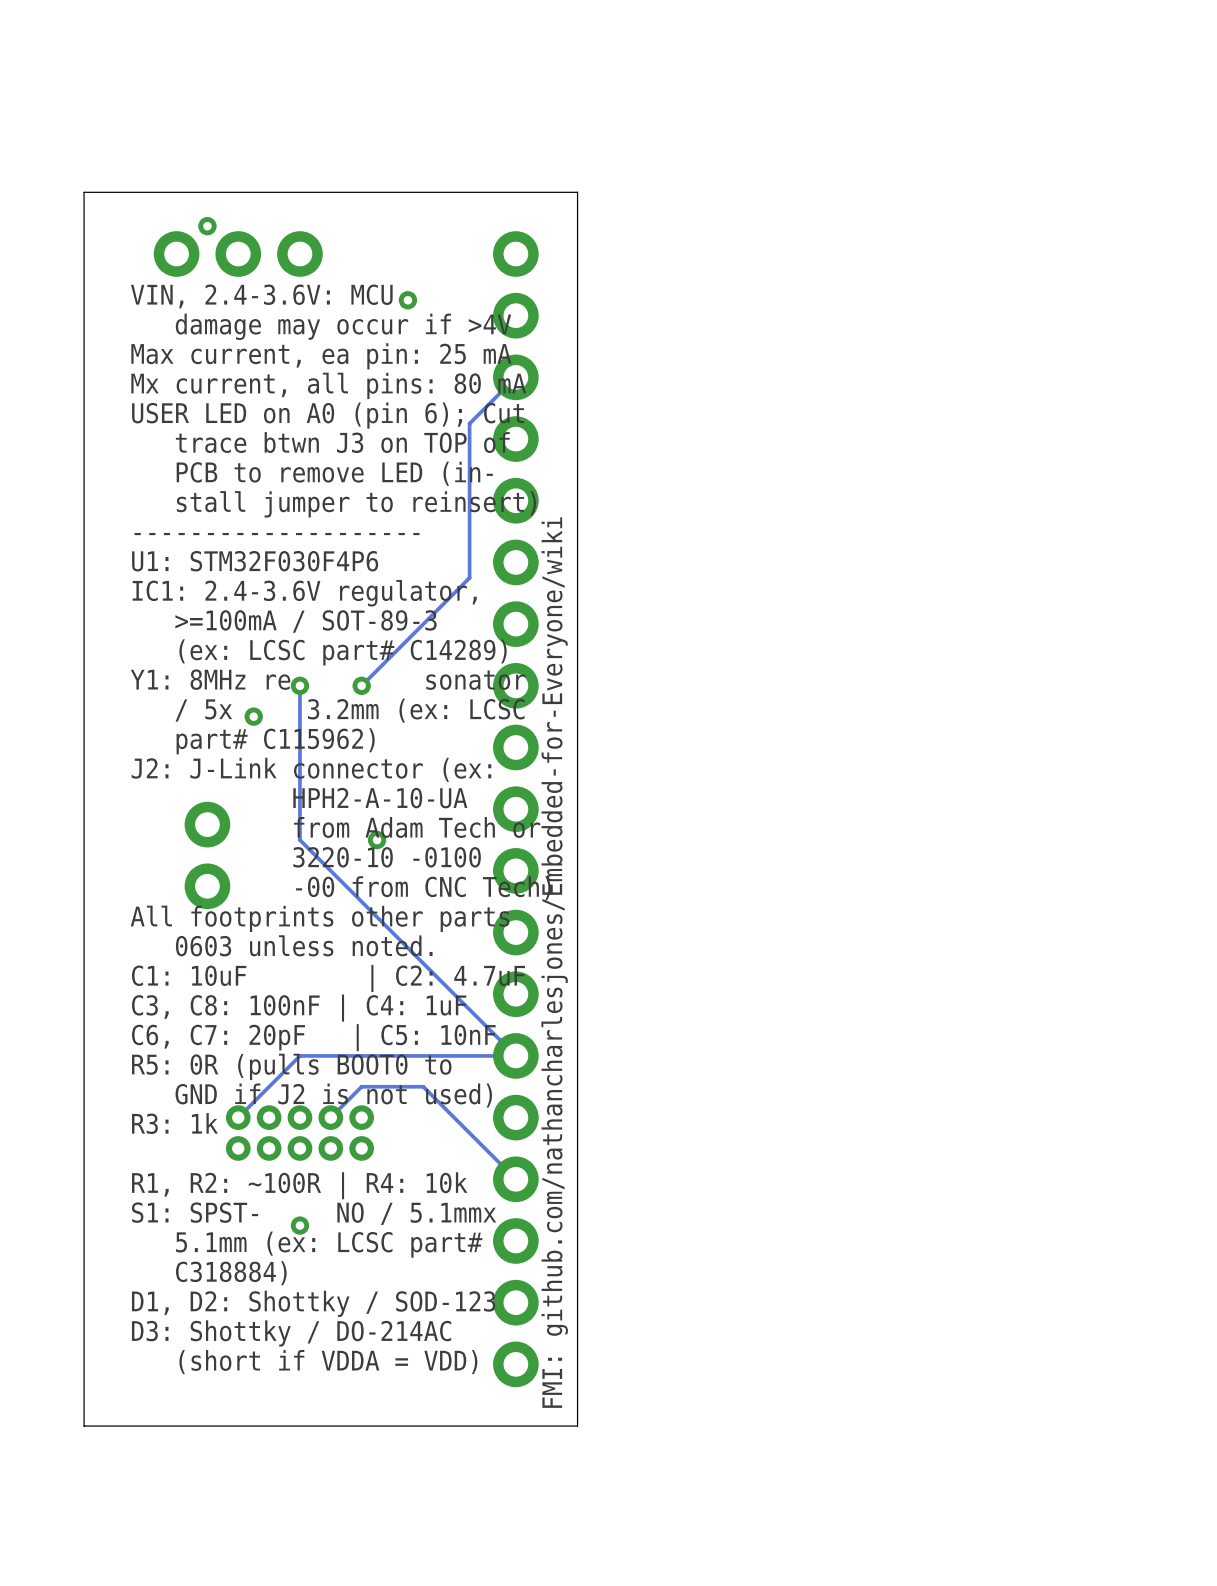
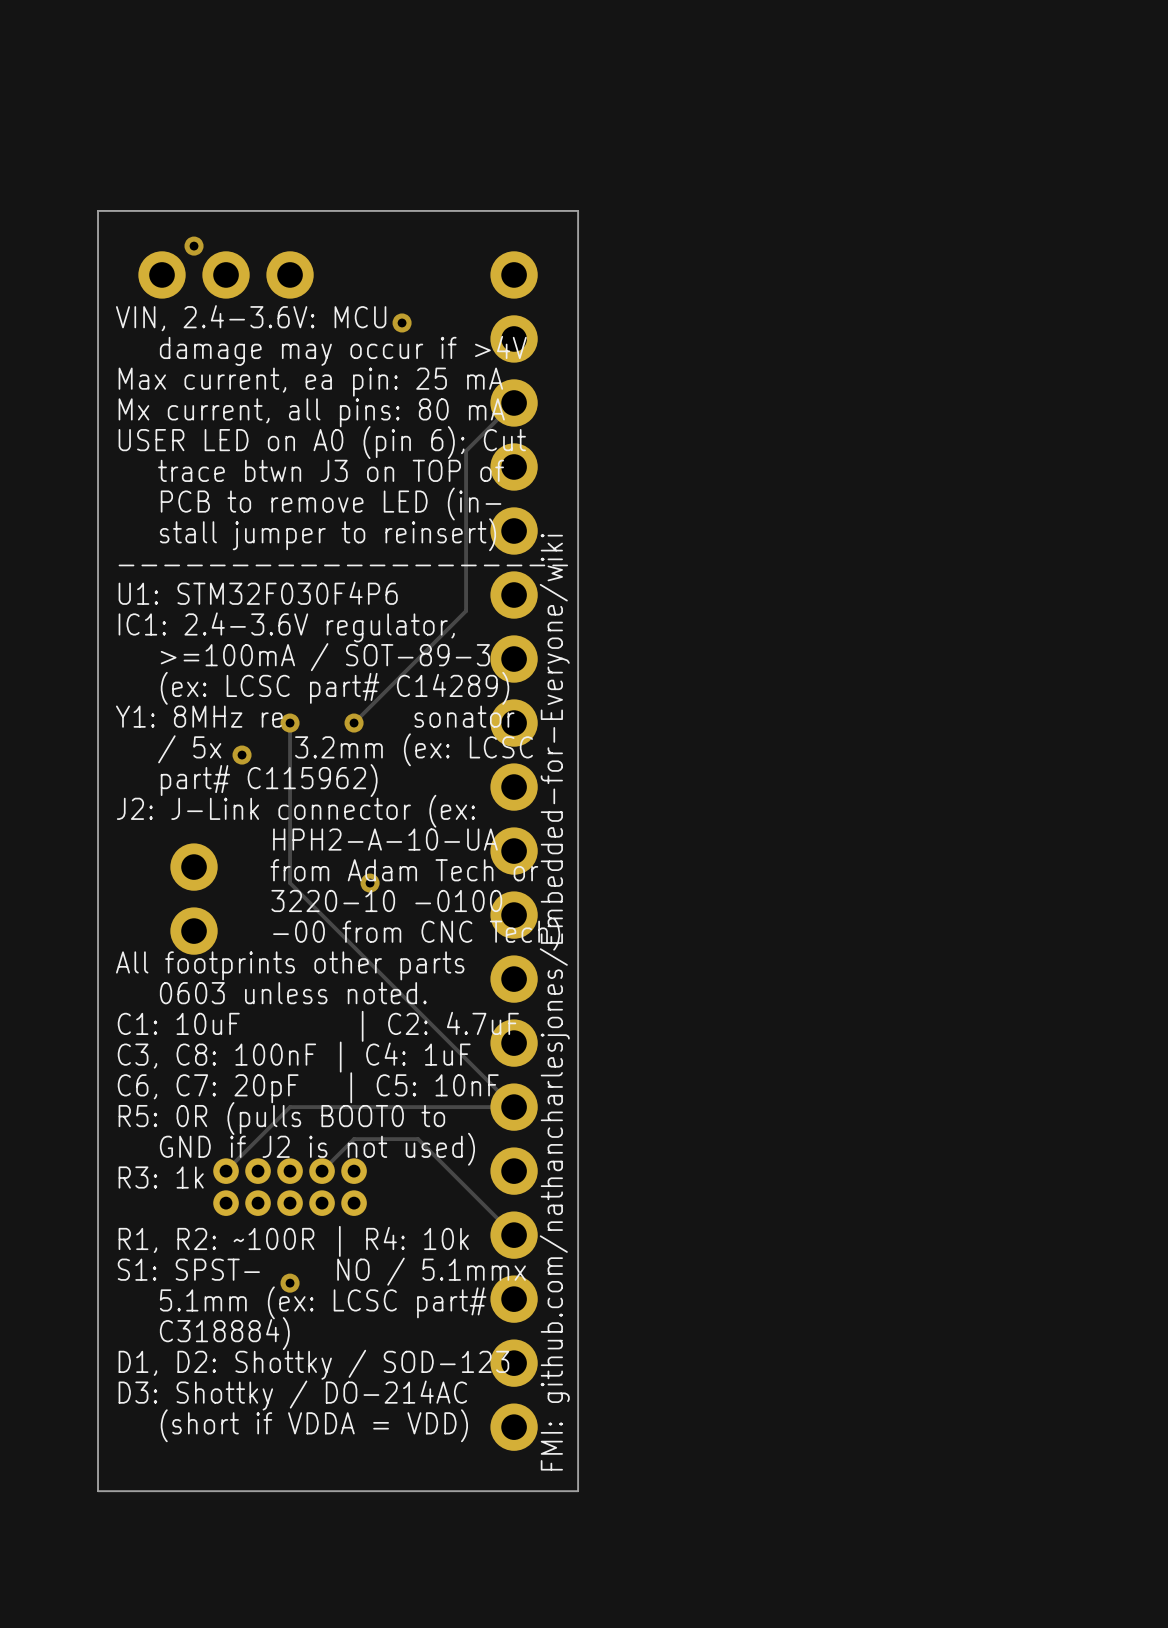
board edge: (114, 192) (84, 192) (84, 1426) (114, 1426) -> (98, 210) (98, 1491)

